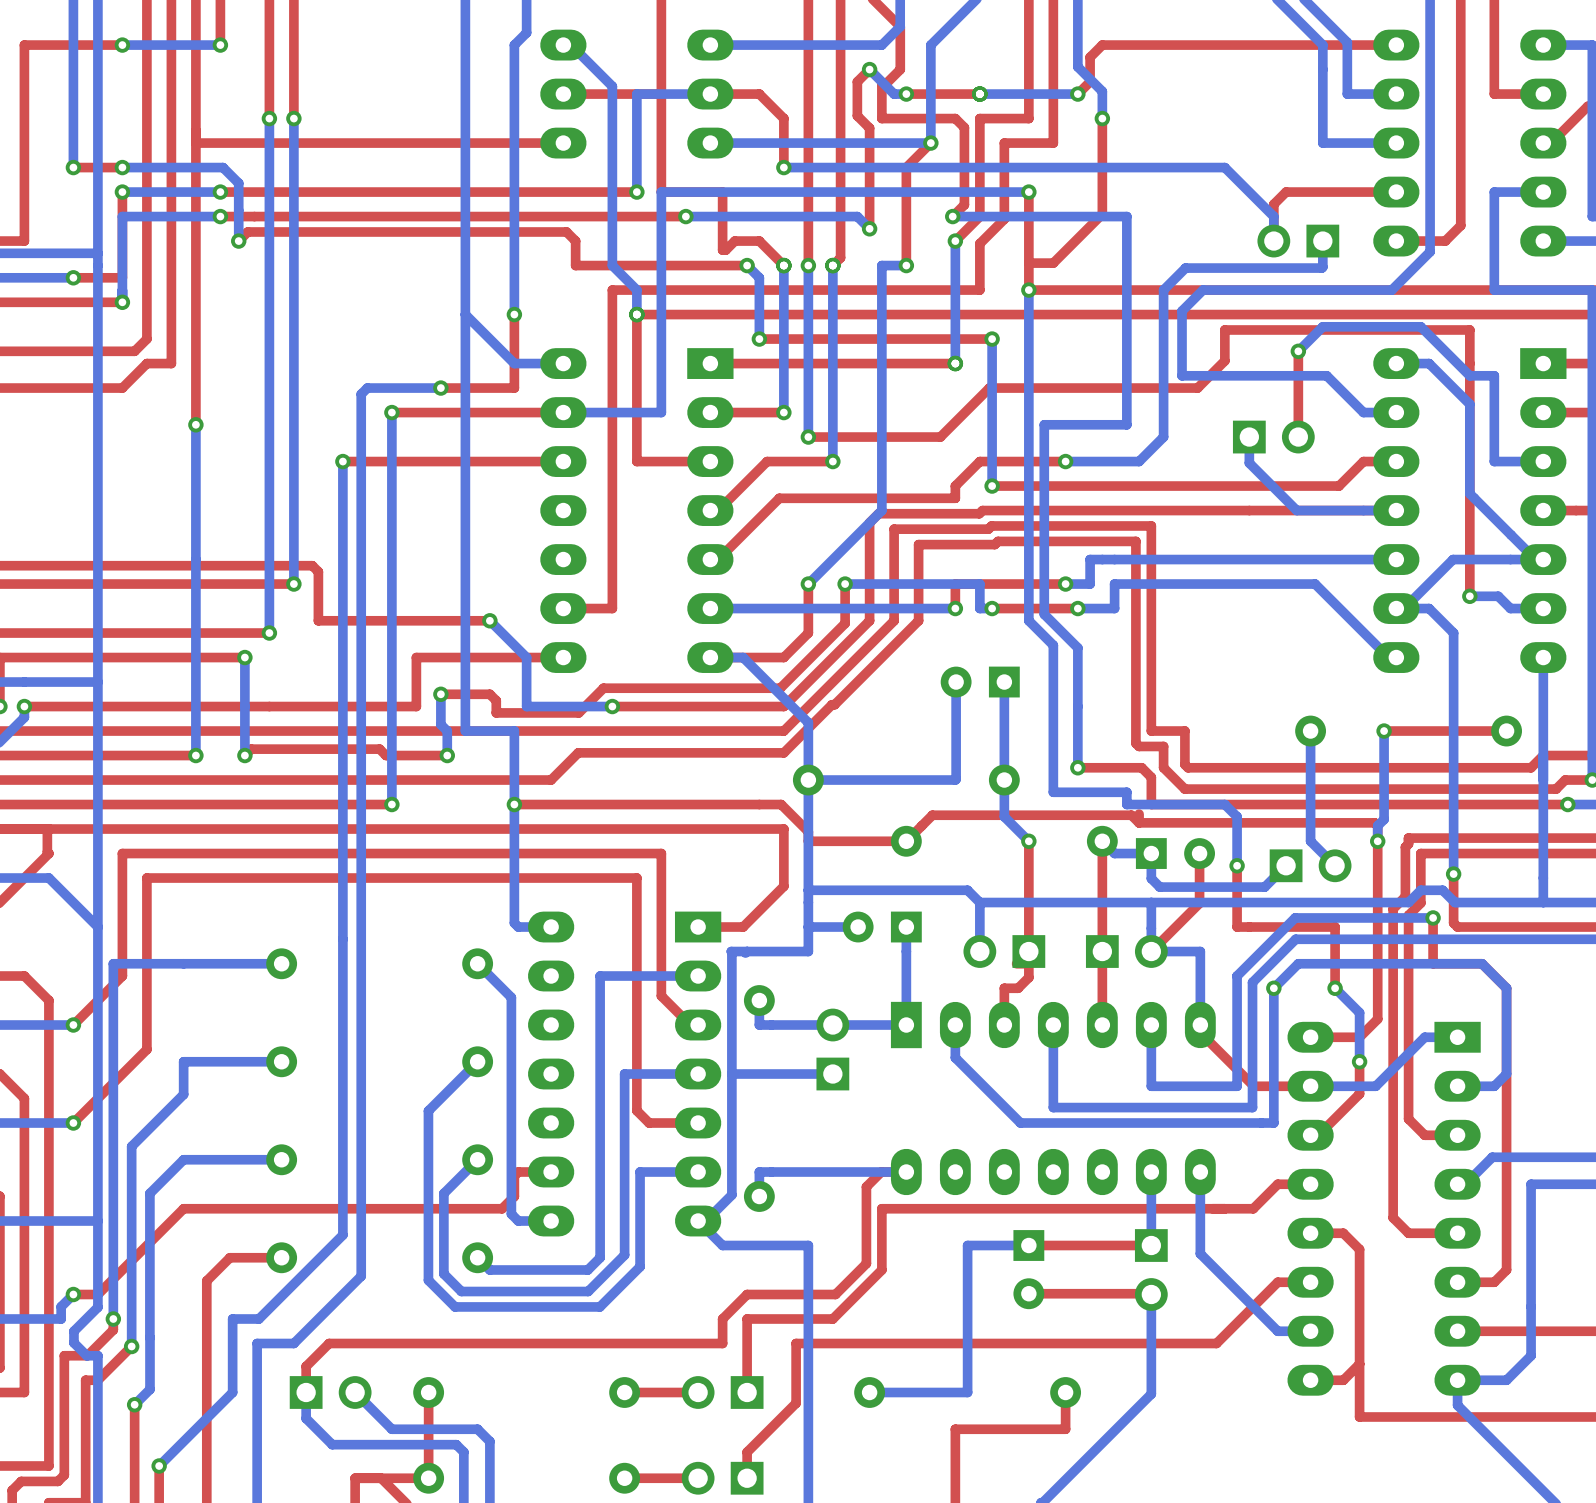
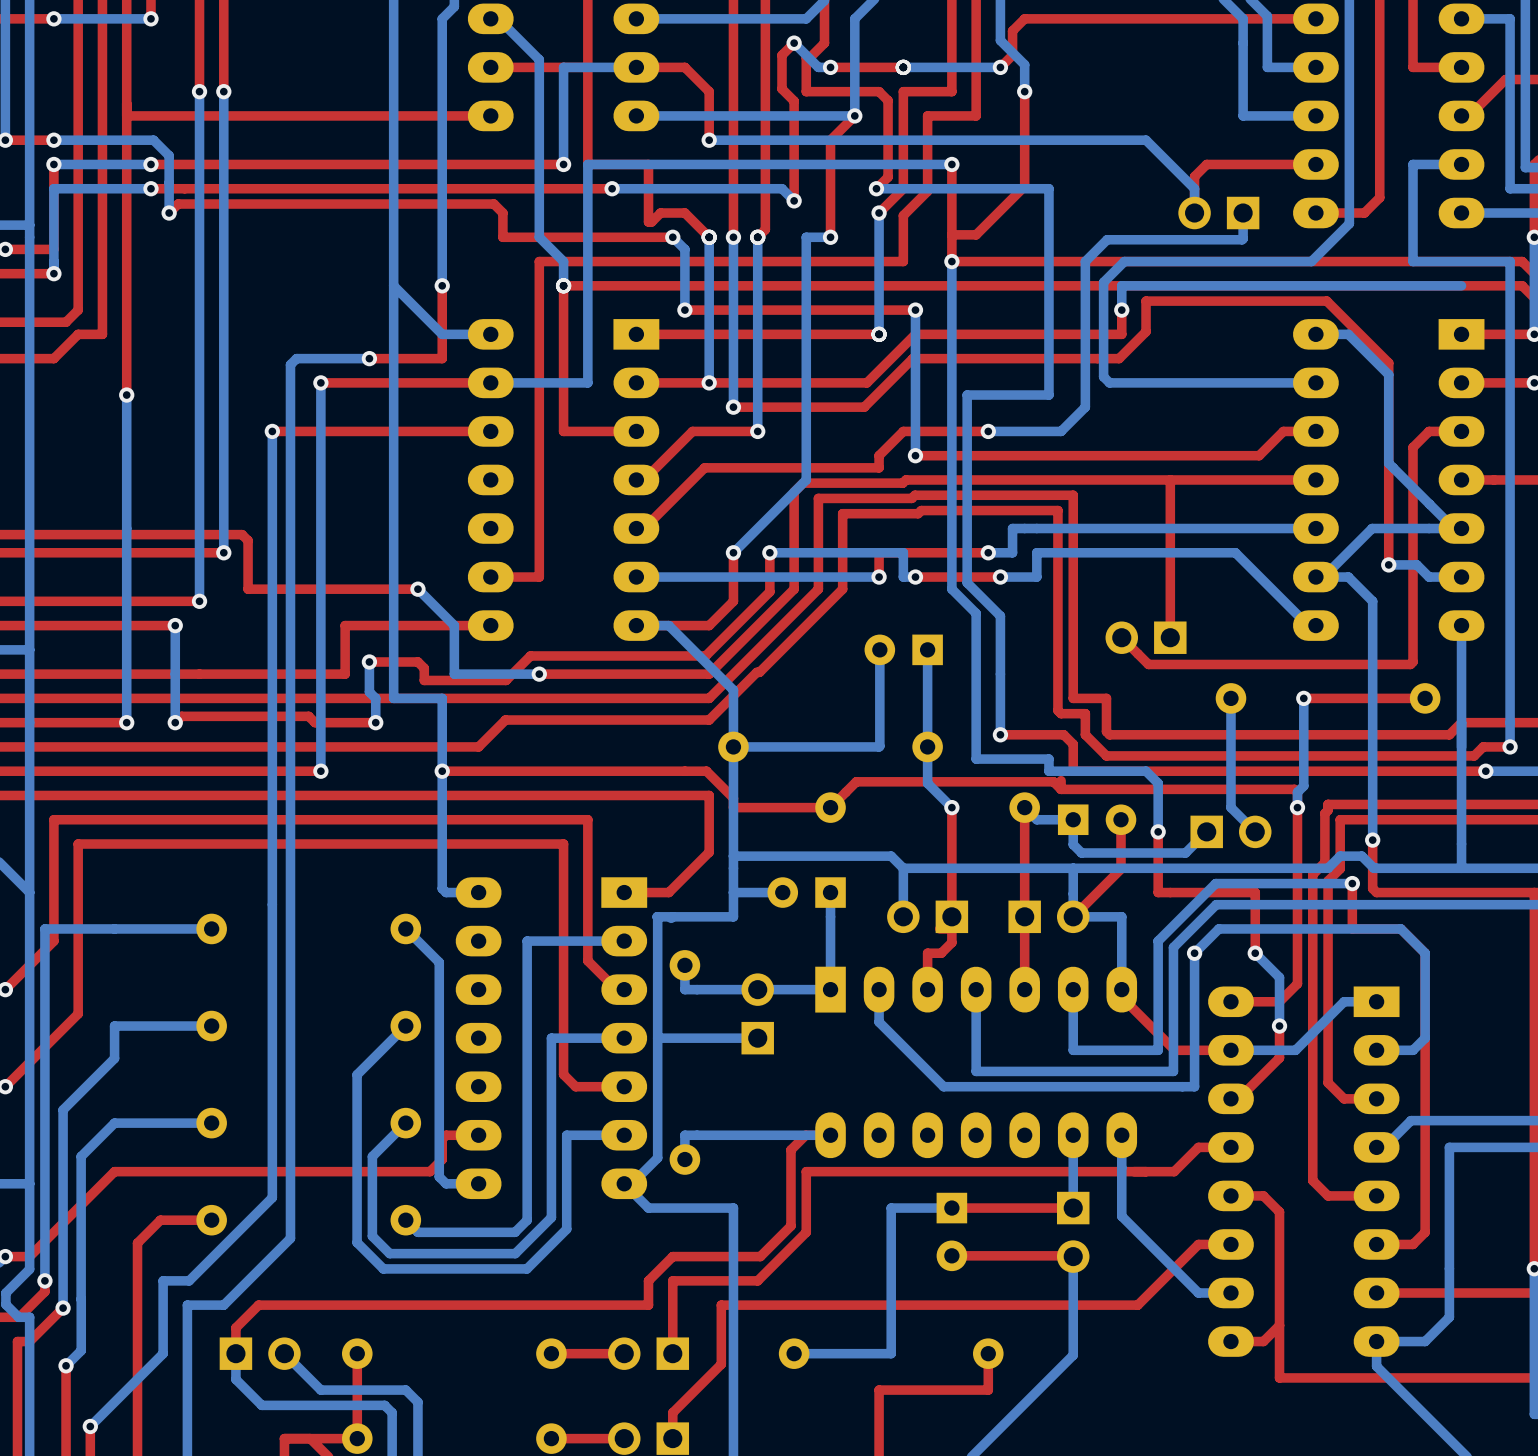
bottom track: none -> (1461, 285) (1121, 285) (1121, 310)
top track: (1407, 329) (1469, 329) (1469, 392) -> (1326, 301) (1388, 363)
top track: none -> (1121, 310) (1121, 334) (915, 334) (866, 382) (709, 382)
top track: (1298, 351) (1298, 437) -> none
bottom track: (1298, 351) (1322, 326) (1420, 326) (1469, 375) (1494, 375) (1494, 461) (1543, 461) -> none
via position: (1298, 351) -> (1121, 310)
bottom track: (1182, 375) (1326, 375) (1363, 412) -> (1103, 346) (1103, 376) (1109, 382) (1283, 382)
bottom track: (1249, 437) (1249, 463) (1296, 510) (1396, 510) -> none
part rotation: 0° (1273, 437) -> 180° (1146, 637)
part position: (1273, 437) -> (1146, 637)
top track: none -> (1461, 431) (1429, 431) (1413, 447) (1413, 661) (1410, 664) (1148, 664) (1121, 637)
top track: none -> (1170, 479) (1170, 637)

